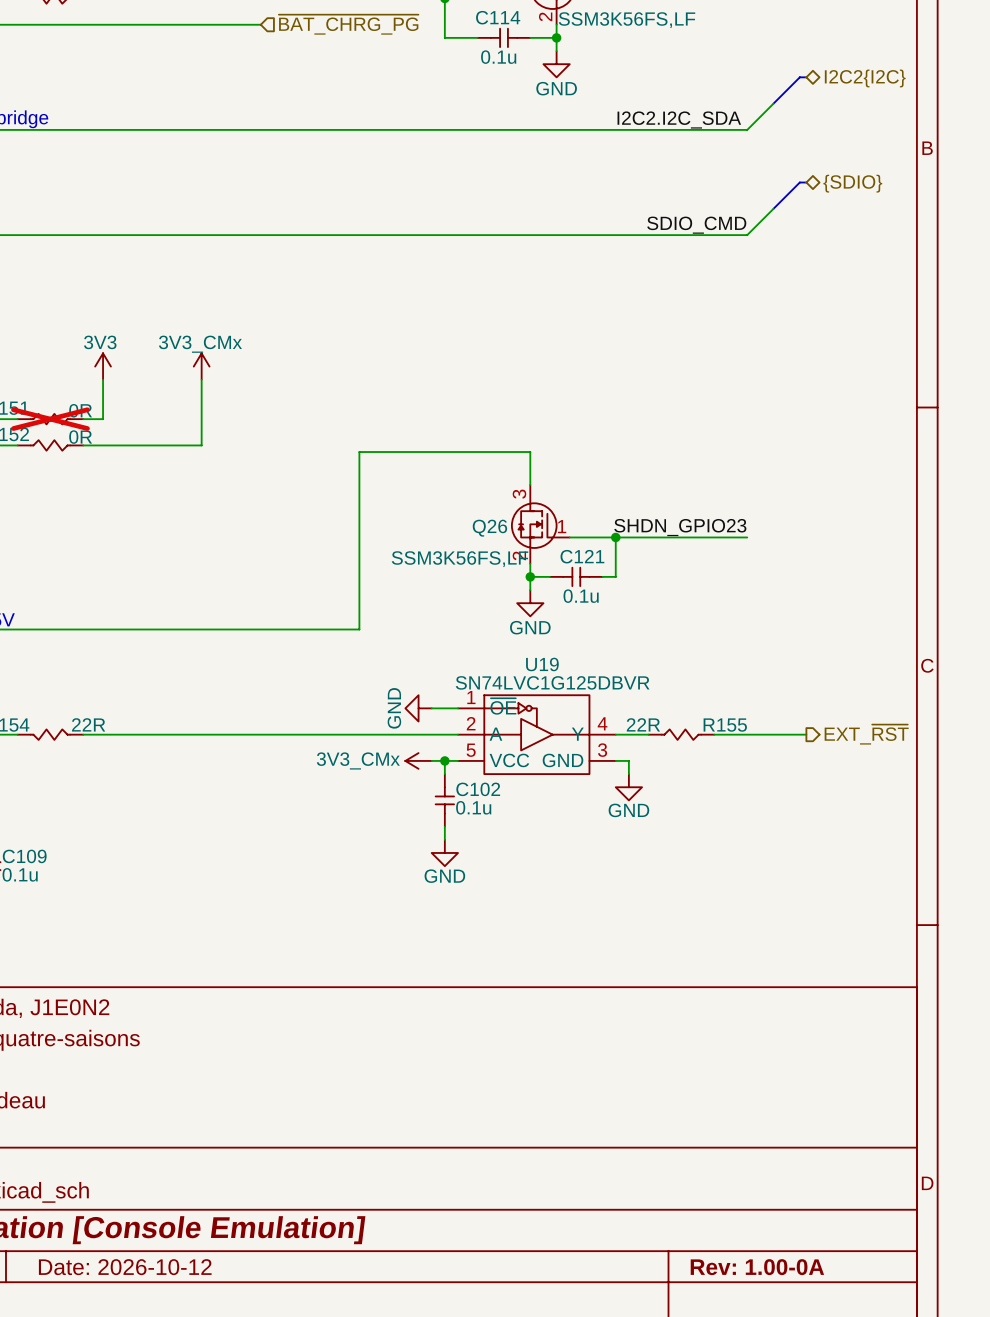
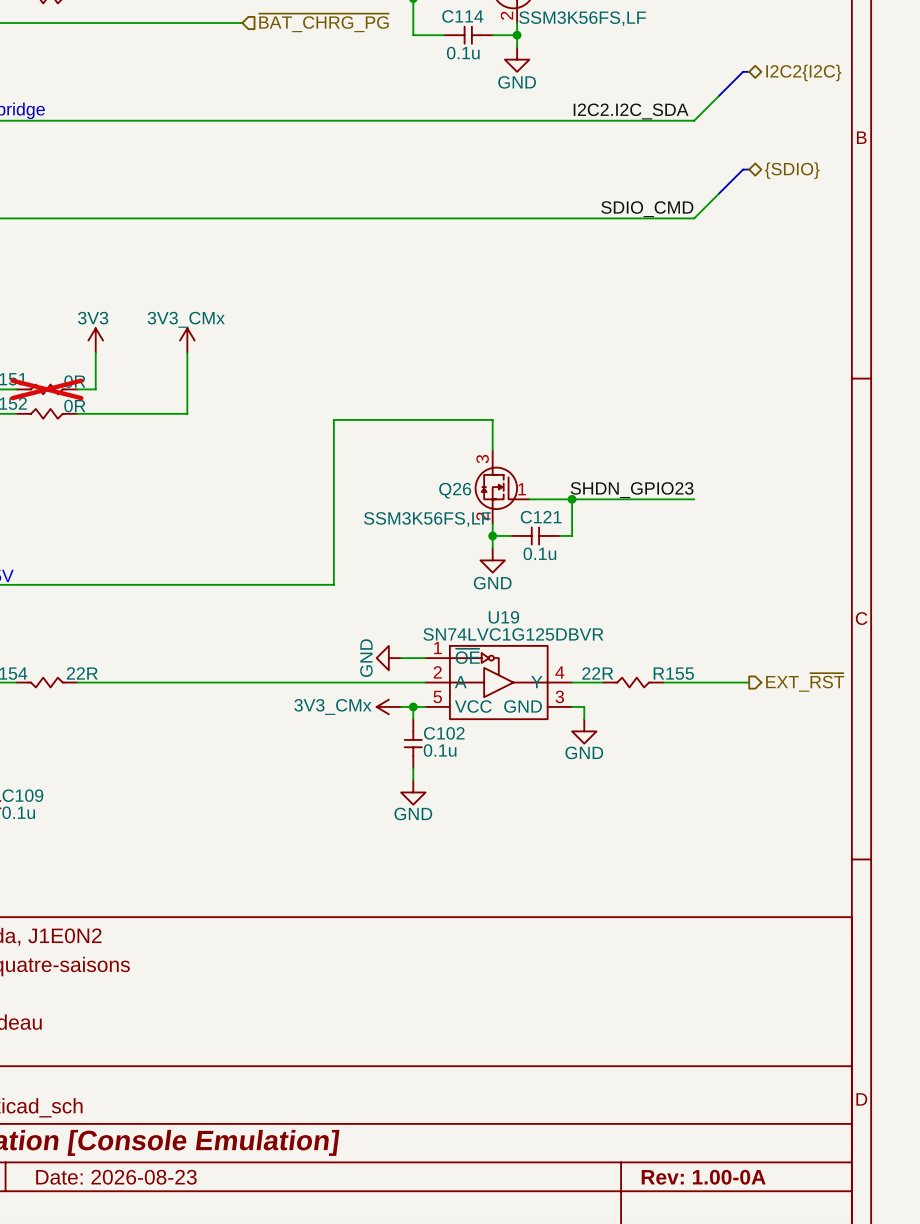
title block: Date: 2026-10-12 (125, 1267) -> Date: 2026-08-23 (116, 1177)

